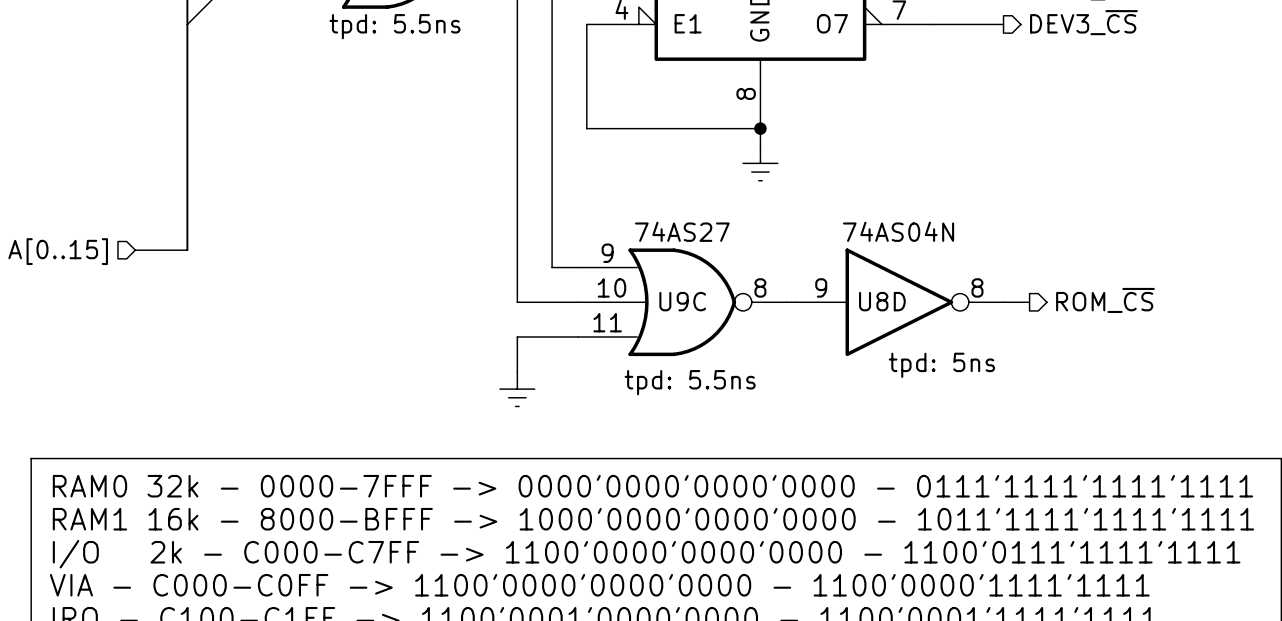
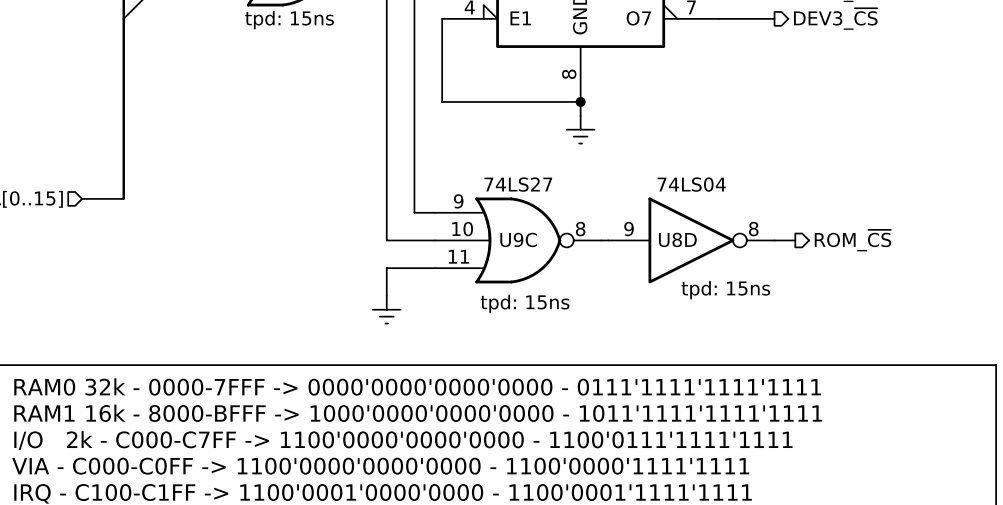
part text: tpd: 5.5ns (394, 26) -> tpd: 15ns (289, 20)
U9C value: 74AS27 (682, 231) -> 74LS27 (518, 184)
U8D value: 74AS04N (898, 231) -> 74LS04 (691, 184)
U8D text: tpd: 5ns (941, 365) -> tpd: 15ns (725, 290)
U9C text: tpd: 5.5ns (690, 382) -> tpd: 15ns (525, 303)

